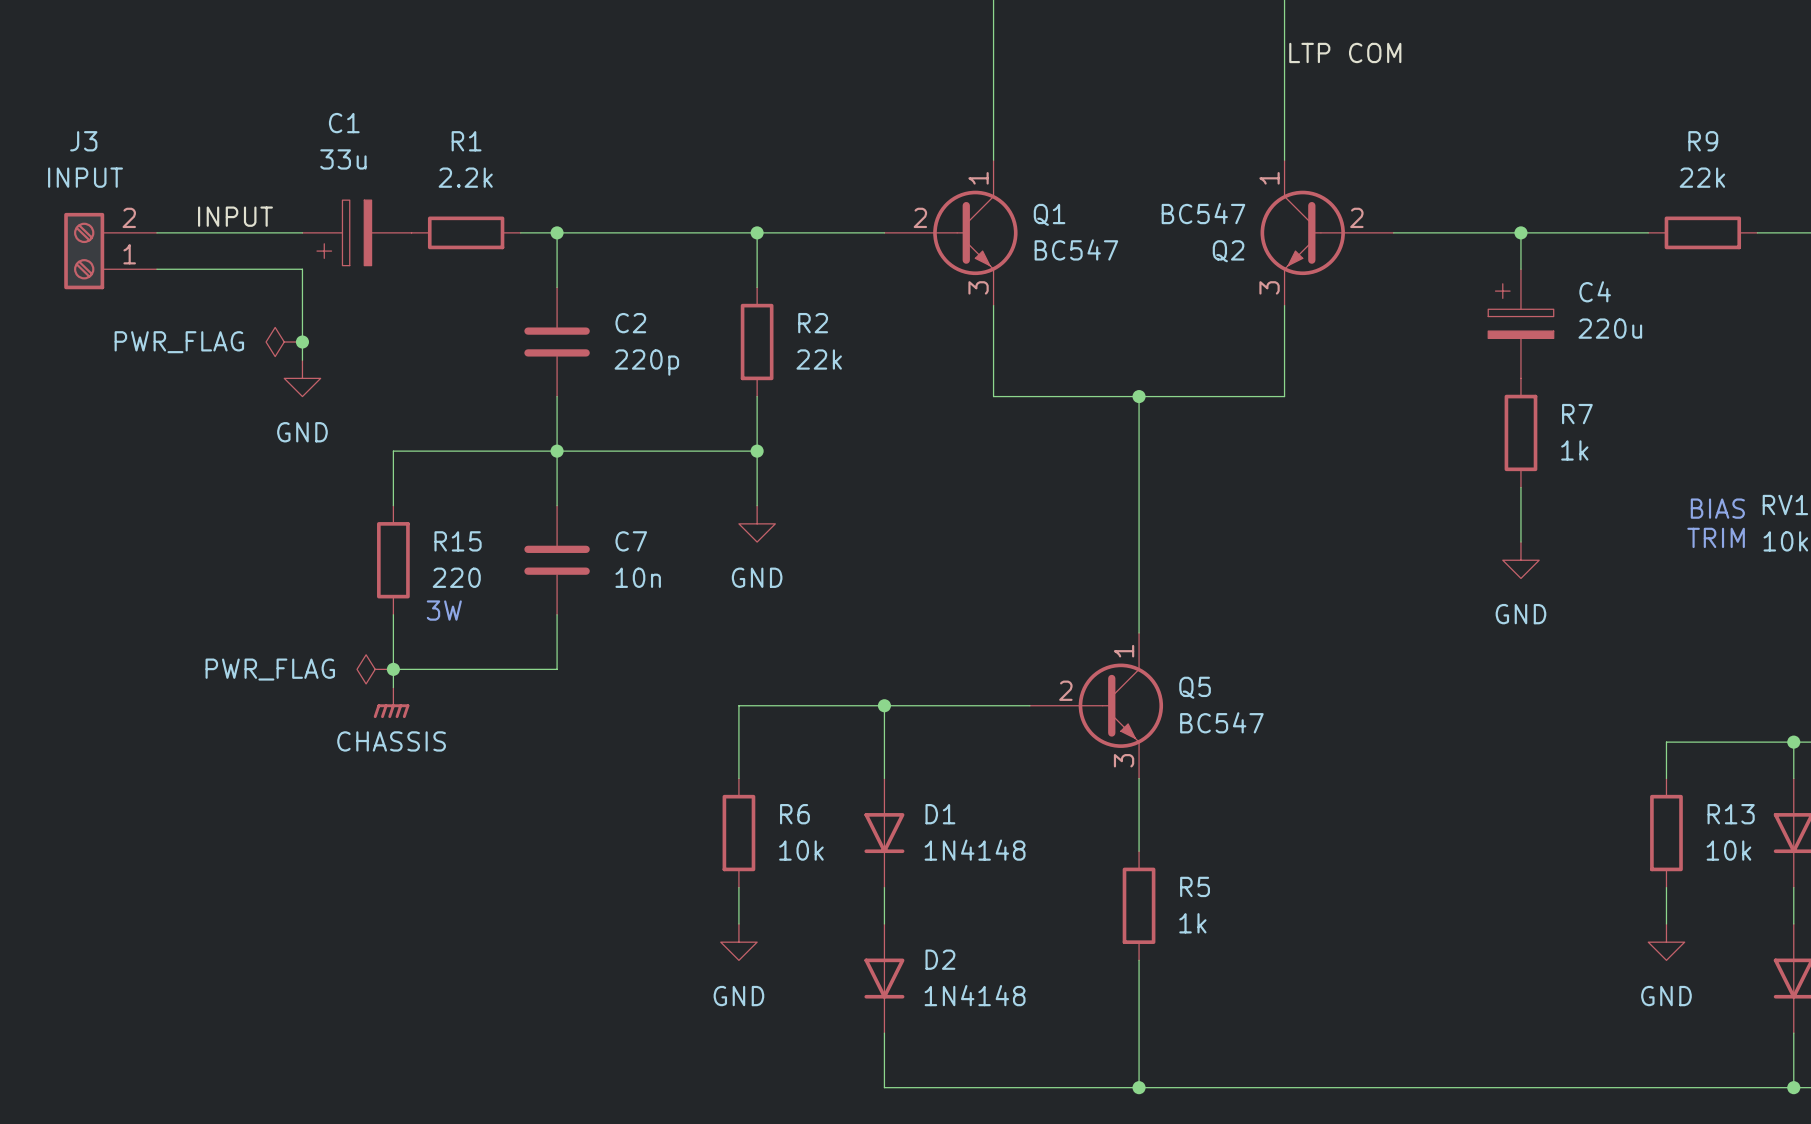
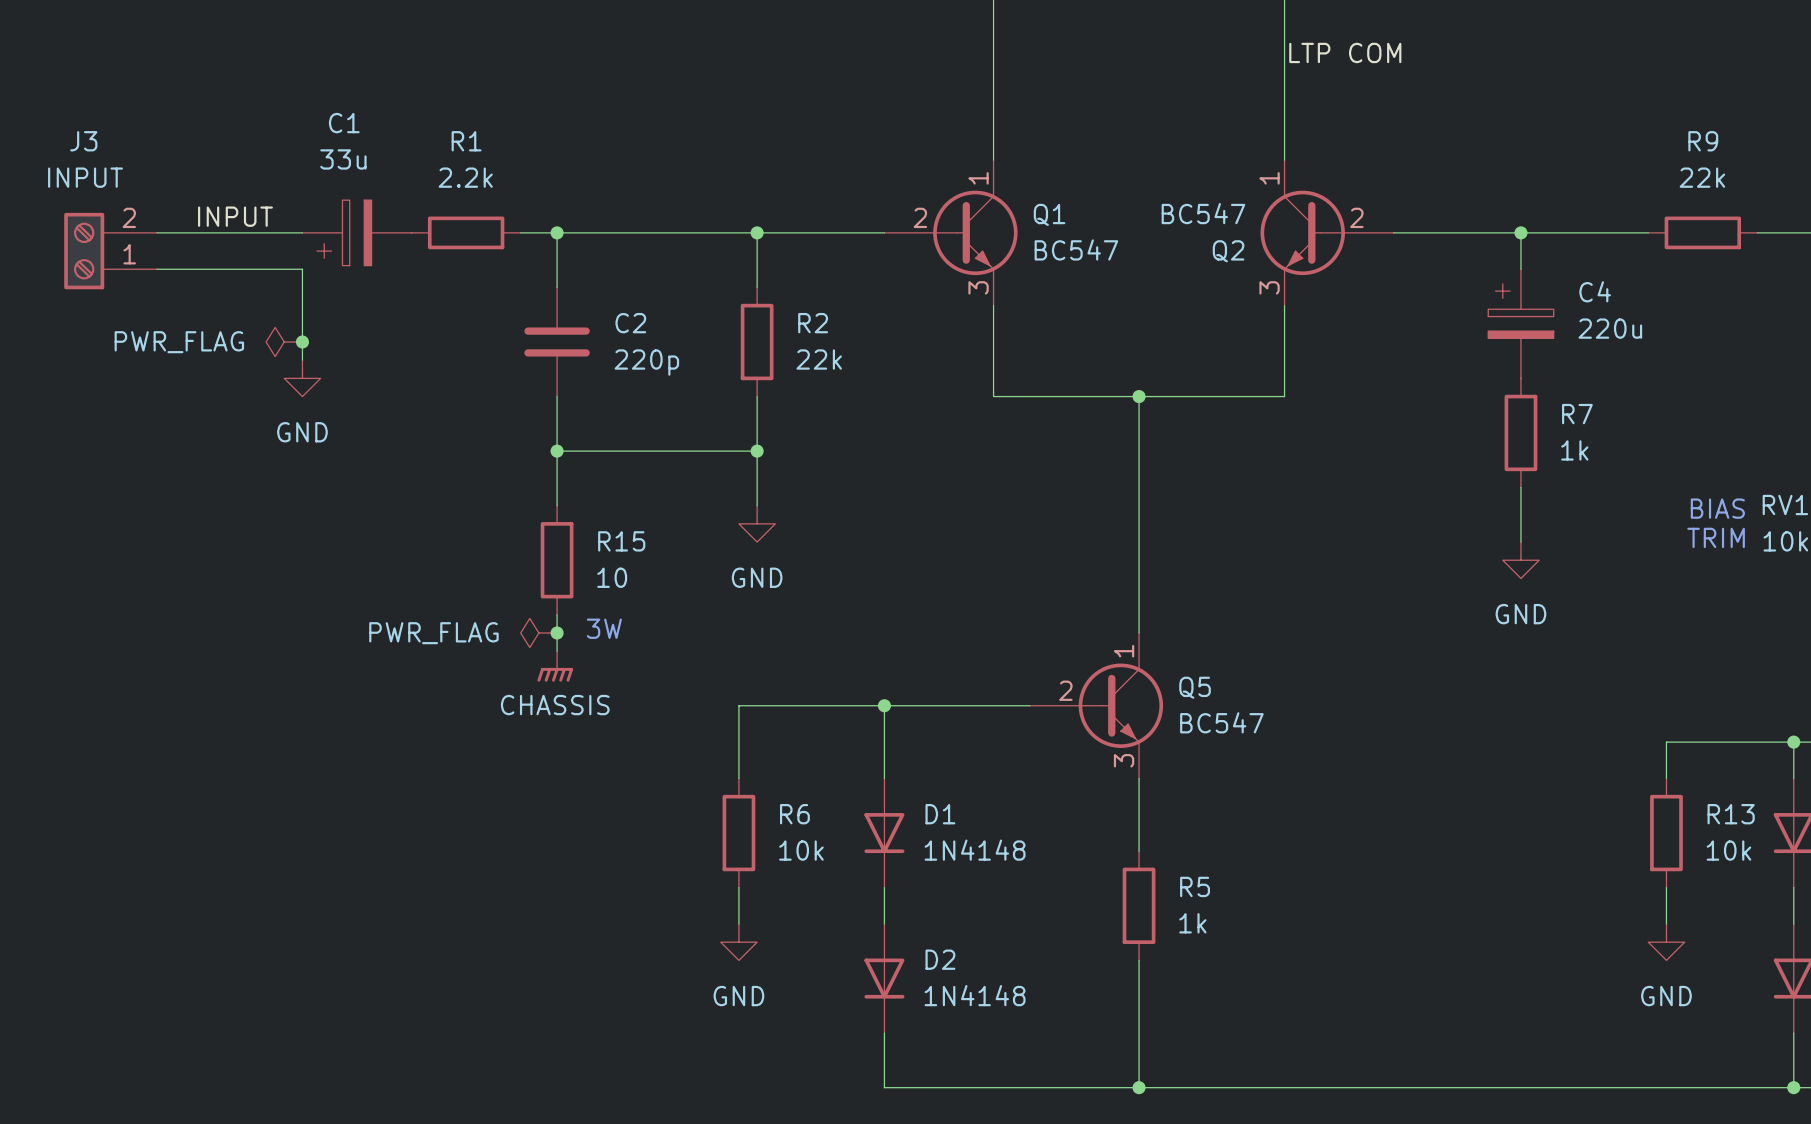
wire: (557, 451) (393, 451) (393, 505) -> none
R15 position: (393, 560) -> (557, 560)
C7: 10n (557, 560) -> none
R15 value: 220 (456, 577) -> 10 (612, 577)
text position: 3W (444, 610) -> 3W (604, 628)
wire: (393, 614) (393, 687) -> none
junction: none -> (557, 632)
wire: (557, 651) (557, 669) (393, 669) -> none
power symbol position: PWR_FLAG (375, 669) -> PWR_FLAG (538, 632)
junction: (393, 669) -> none
power symbol position: CHASSIS (391, 702) -> CHASSIS (555, 666)

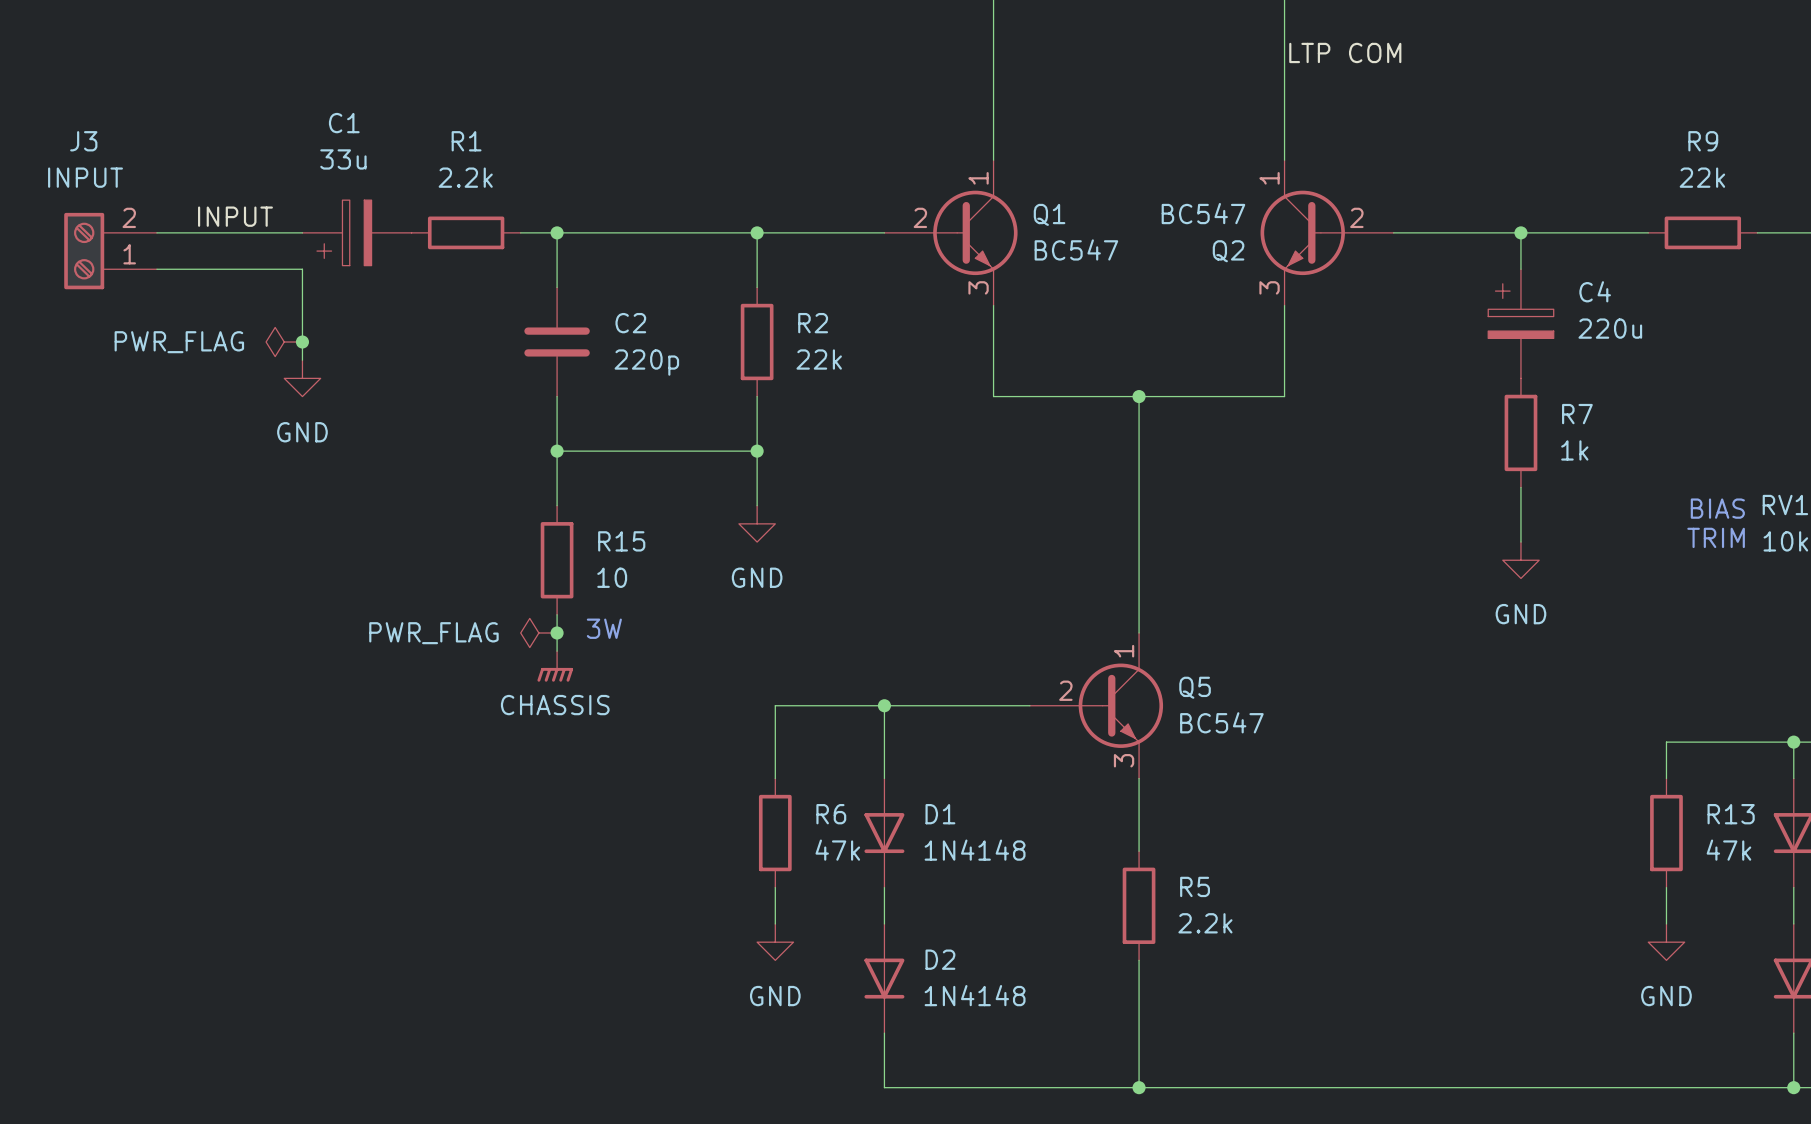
wire: (775, 705) (738, 705) (738, 778) -> (775, 705) (775, 778)
R6 position: (738, 833) -> (775, 833)
R6 value: 10k (801, 850) -> 47k (837, 850)
R13 value: 10k (1728, 850) -> 47k (1728, 850)
wire: (738, 887) (738, 923) -> (775, 887) (775, 923)
R5 value: 1k (1192, 923) -> 2.2k (1205, 923)
power symbol position: GND (738, 942) -> GND (775, 942)

